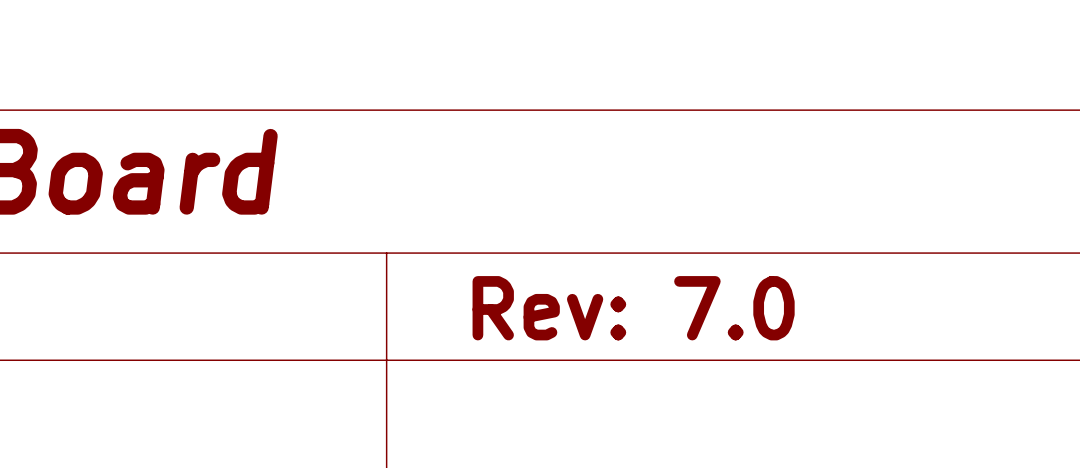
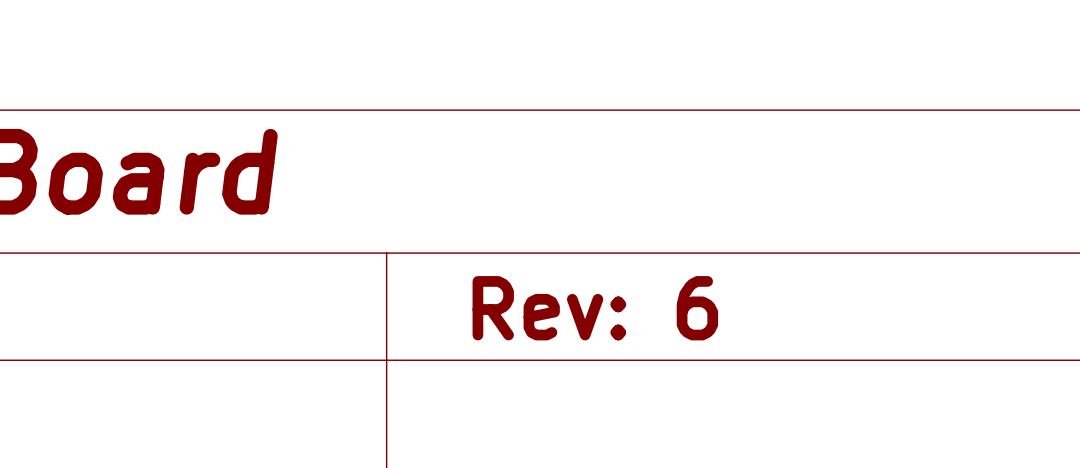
title block: Rev: 7.0 (633, 308) -> Rev: 6 (595, 308)

